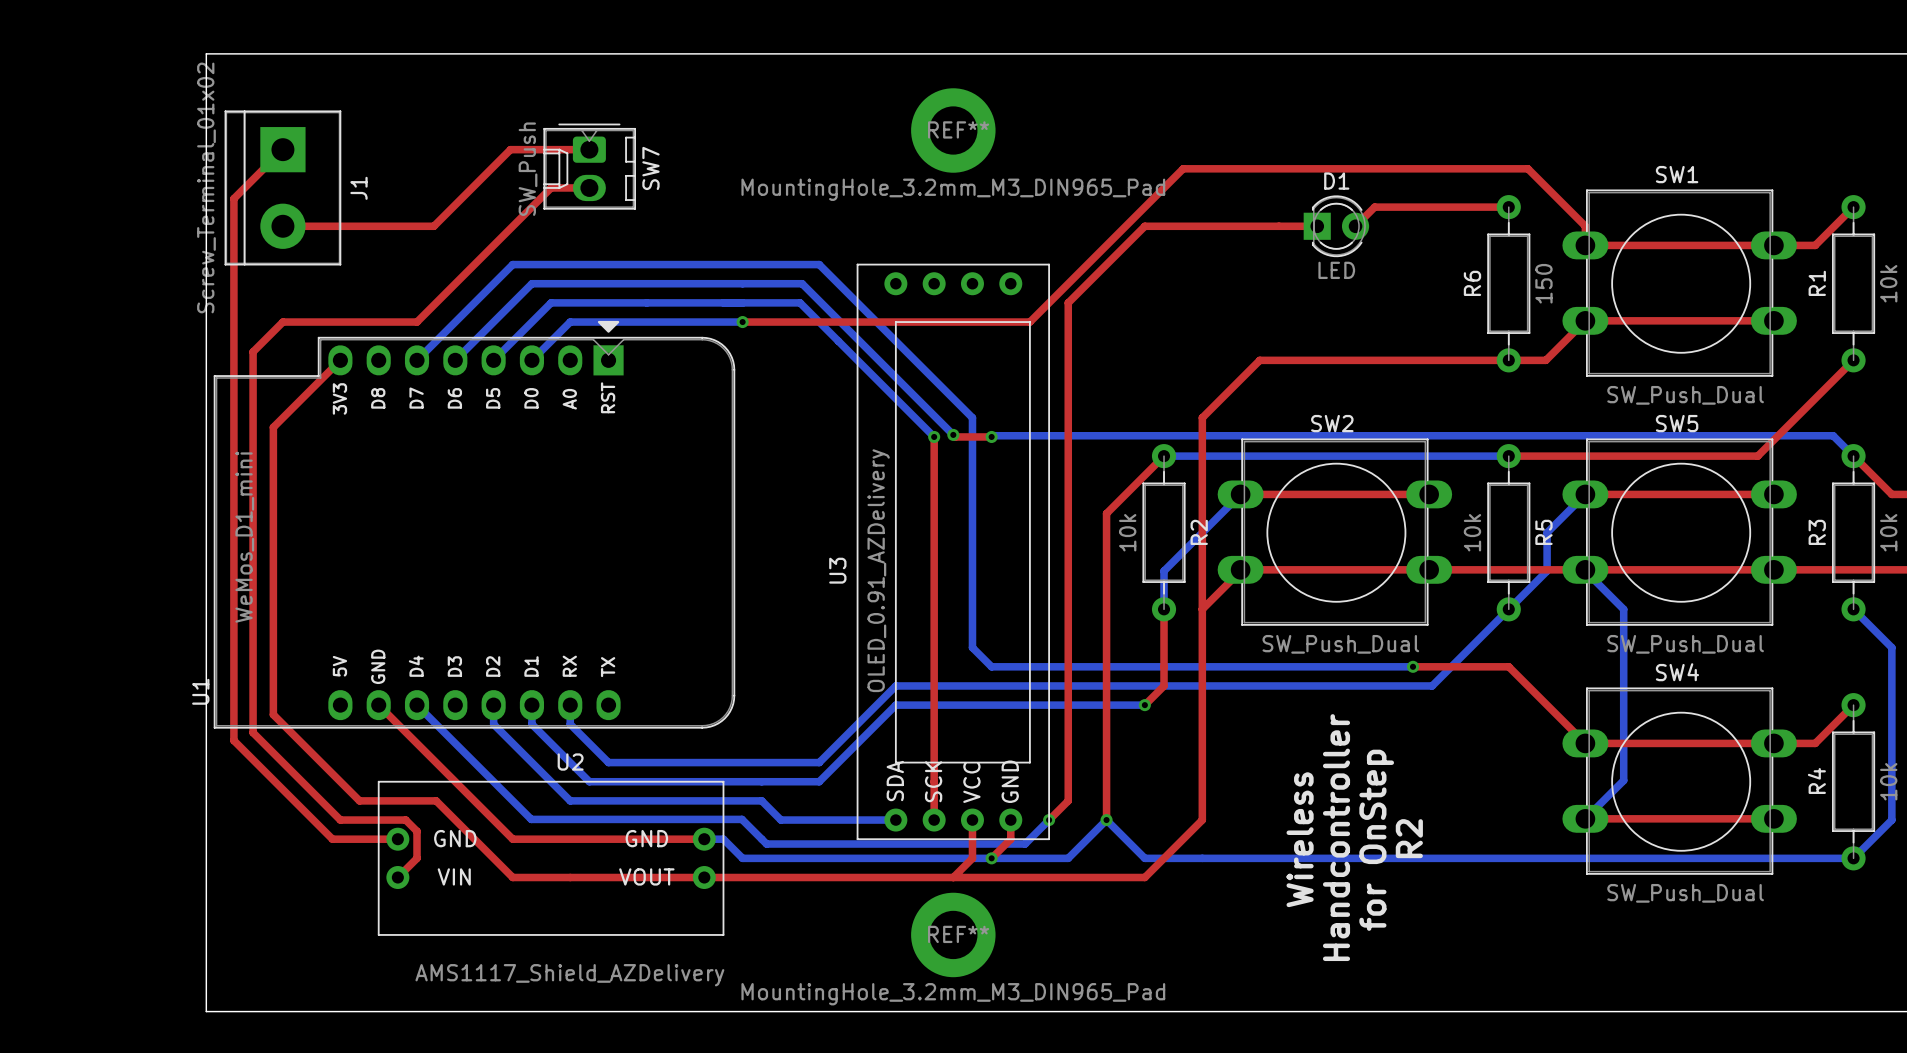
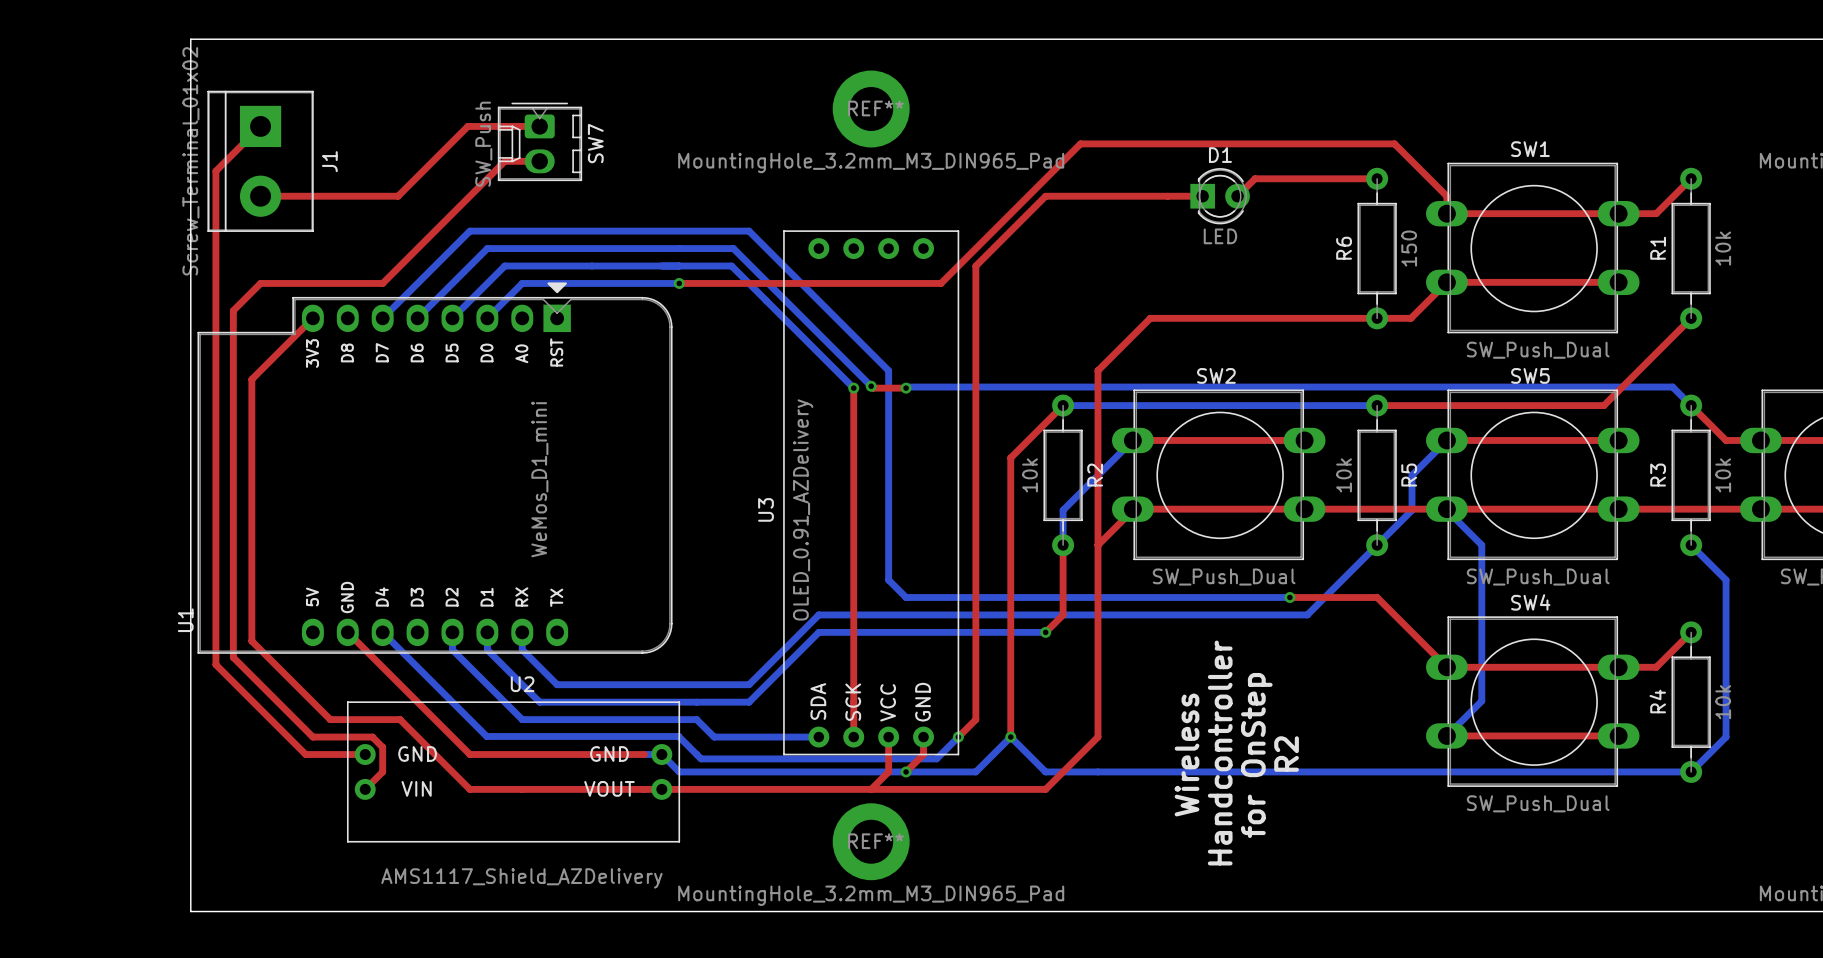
U3 footprint: [856, 263, 1051, 841] -> [783, 230, 960, 756]
U1 value position: WeMos_D1_mini (244, 537) -> WeMos_D1_mini (539, 479)
U2 footprint: [377, 780, 725, 936] -> [346, 701, 681, 843]

